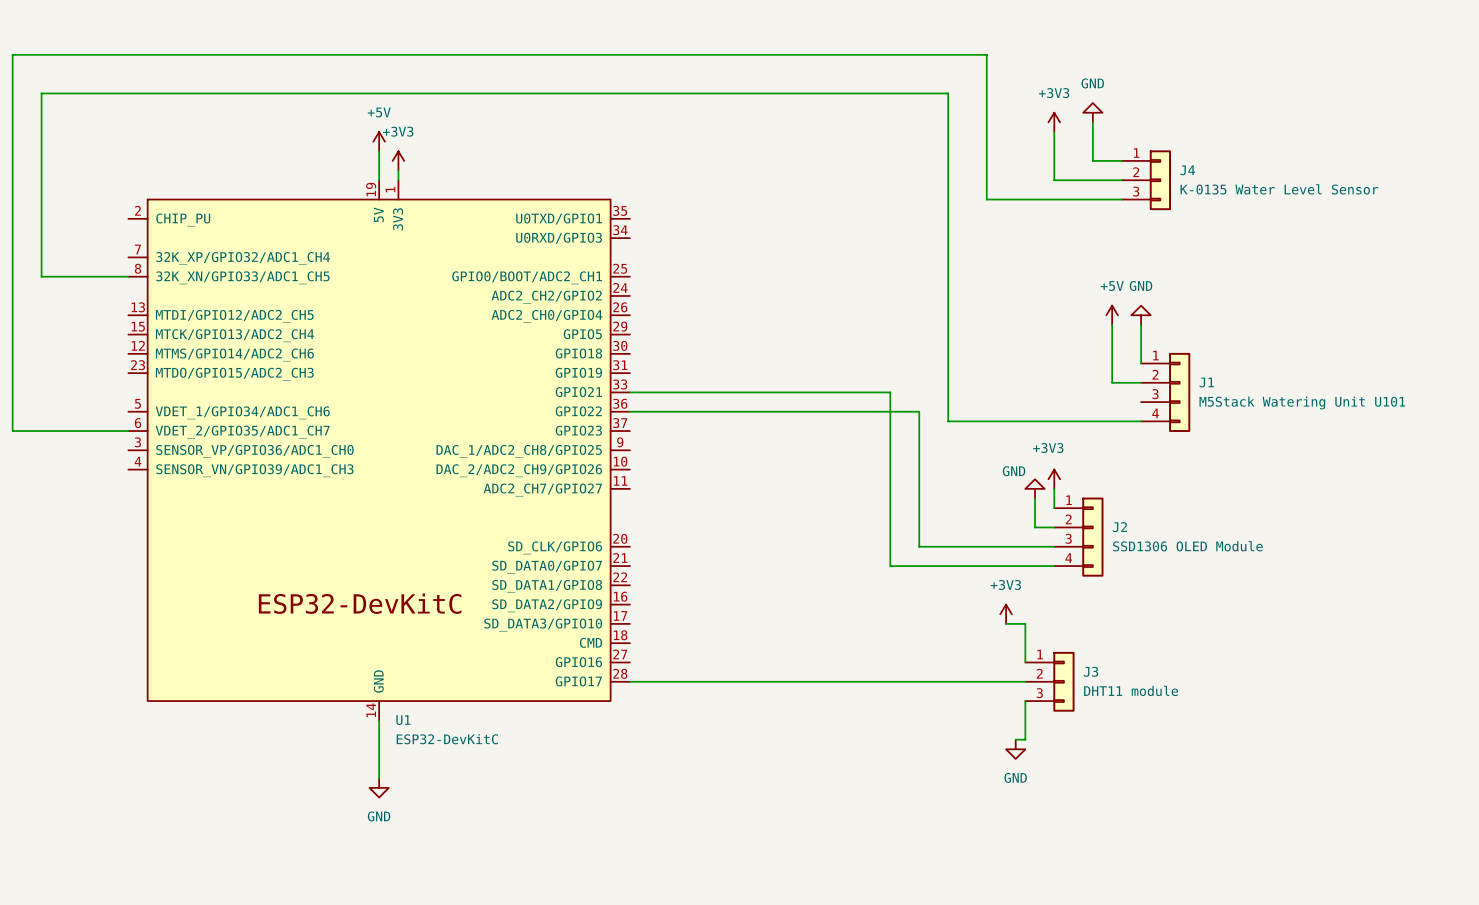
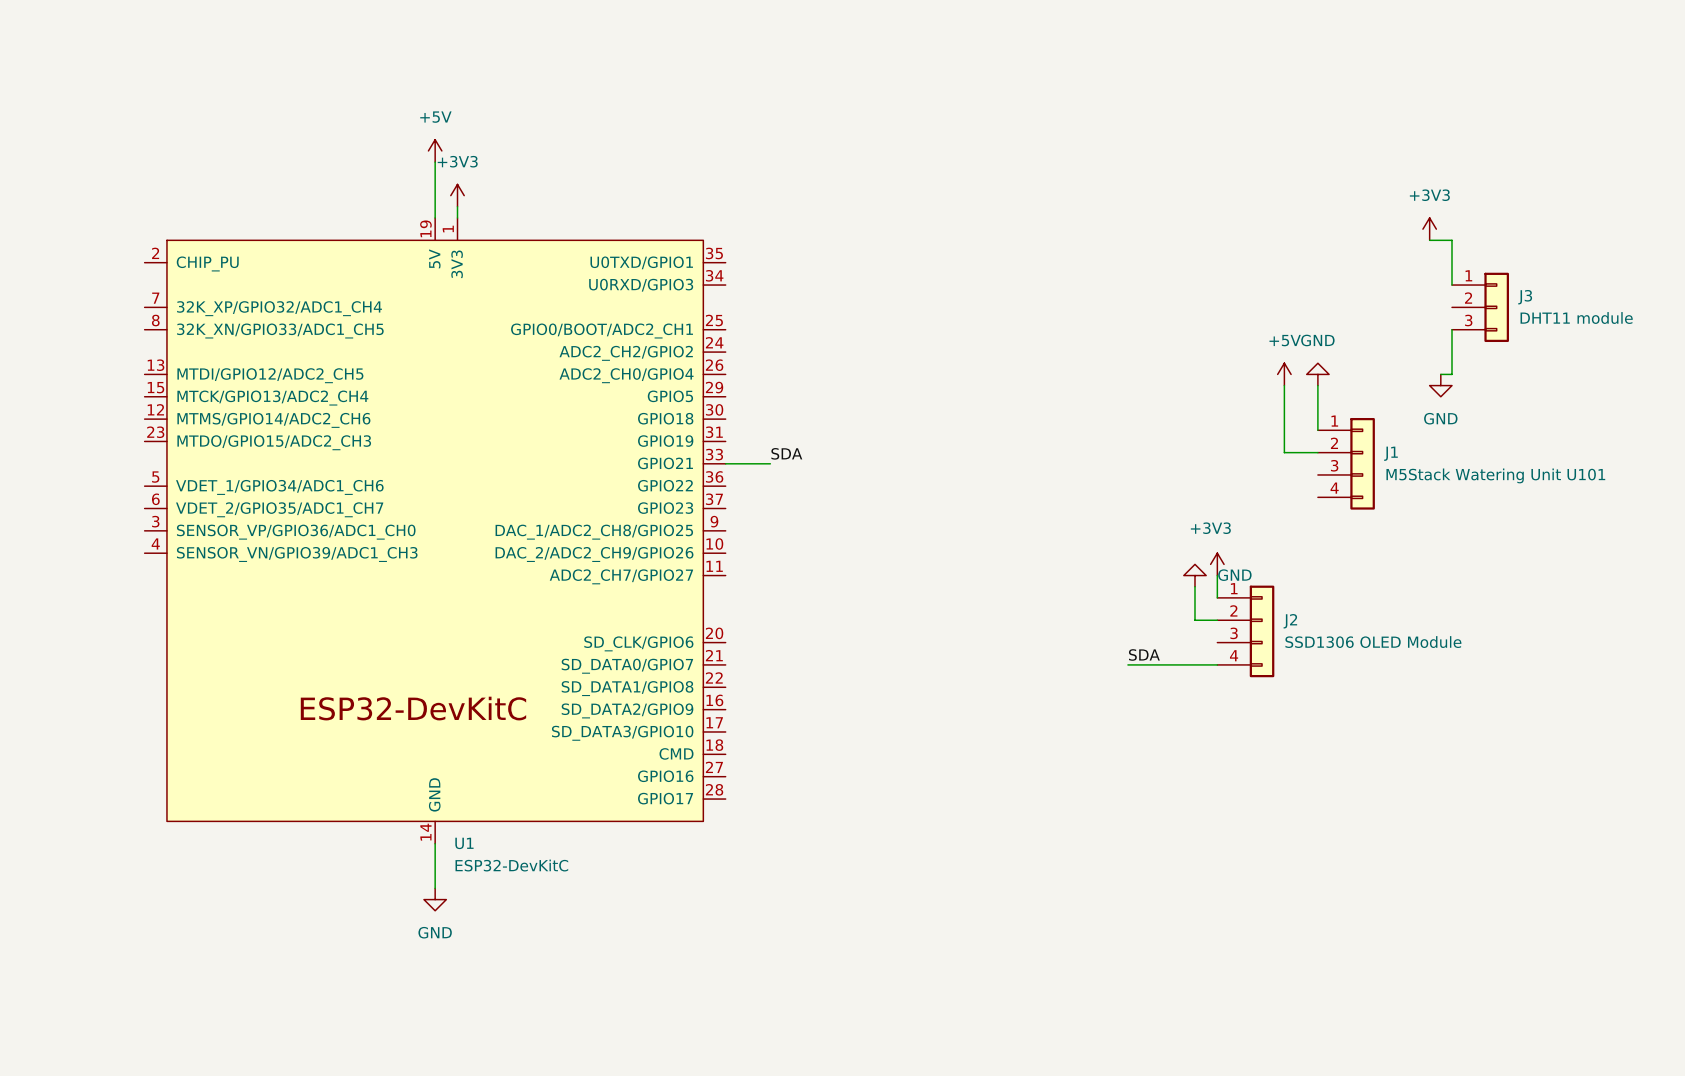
power symbol: GND (1092, 112) -> none
power symbol: +3V3 (1054, 122) -> none
wire: (1092, 122) (1092, 160) (1121, 160) -> none
wire: (1054, 132) (1054, 180) (1121, 180) -> none
power symbol position: +5V (379, 141) -> +5V (435, 150)
J4: K-0135 Water Level Sensor (1146, 180) -> none
power symbol: none -> +3V3 (1429, 229)
wire: (1121, 199) (986, 199) (986, 54) (12, 54) (12, 431) (128, 431) -> none
wire: none -> (1429, 240) (1451, 240) (1451, 285)
wire: (128, 276) (41, 276) (41, 93) (948, 93) (948, 421) (1141, 421) -> none
wire: none -> (1451, 329) (1451, 374) (1440, 374)
power symbol: none -> GND (1440, 385)
label: none -> SDA (786, 453)
wire: (668, 392) (890, 392) (890, 566) (977, 566) -> none
wire: (629, 411) (919, 411) (919, 546) (1054, 546) -> none
power symbol text position: GND (1014, 471) -> GND (1234, 575)
label: none -> SDA (1144, 654)
power symbol: +3V3 (1006, 614) -> none
wire: (1006, 623) (1025, 623) (1025, 662) -> none
wire: (629, 681) (1025, 681) -> none
J3 position: (1049, 681) -> (1480, 307)
wire: (1025, 701) (1025, 739) (1015, 739) -> none
power symbol: GND (1015, 749) -> none
power symbol position: GND (379, 787) -> GND (435, 899)

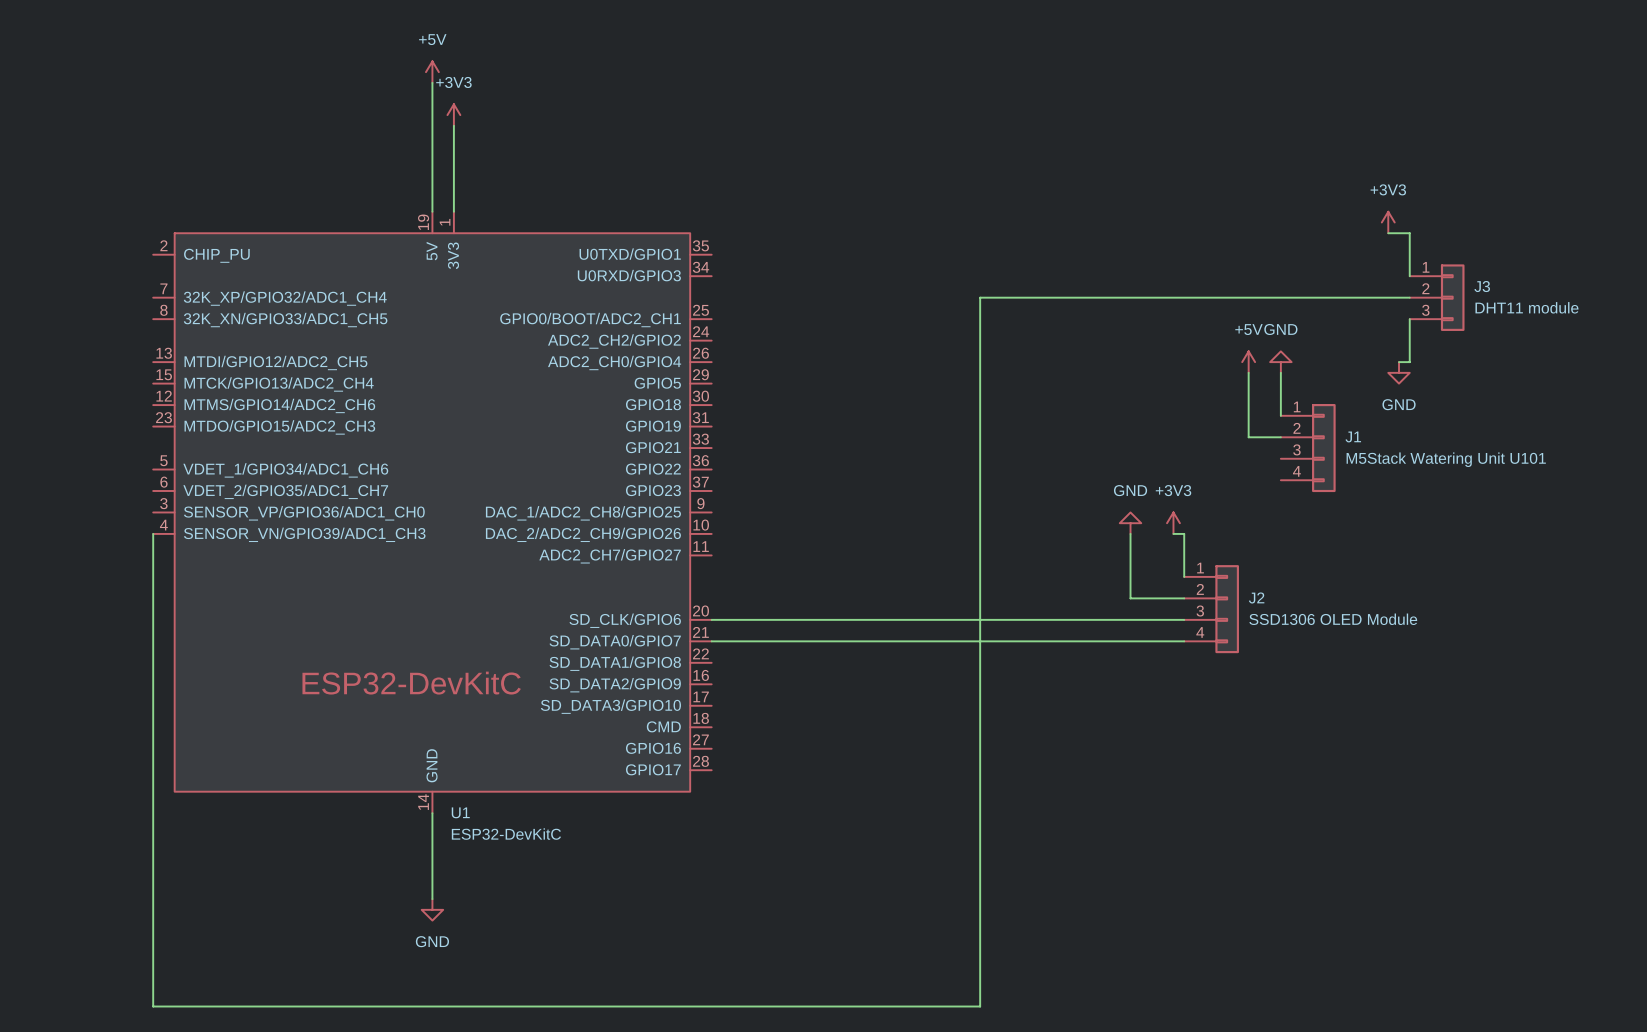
wire: none -> (432, 82) (432, 158)
wire: none -> (453, 125) (453, 201)
power symbol position: +5V (435, 150) -> +5V (432, 72)
power symbol position: +3V3 (457, 195) -> +3V3 (453, 115)
wire: none -> (1409, 297) (980, 297) (980, 1006) (153, 1006) (153, 533)
label: SDA (786, 453) -> none
wire: (725, 463) (770, 463) -> none
power symbol text position: +3V3 (1210, 528) -> +3V3 (1173, 490)
power symbol position: +3V3 (1217, 564) -> +3V3 (1173, 523)
power symbol position: GND (1194, 575) -> GND (1130, 523)
power symbol text position: GND (1234, 575) -> GND (1130, 490)
wire: (1194, 586) (1194, 620) -> (1130, 533) (1130, 598) (1162, 598)
wire: none -> (711, 619) (1184, 619)
label: SDA (1144, 654) -> none
wire: none -> (711, 641) (1098, 641)
wire: none -> (432, 856) (432, 899)
power symbol position: GND (435, 899) -> GND (432, 909)

